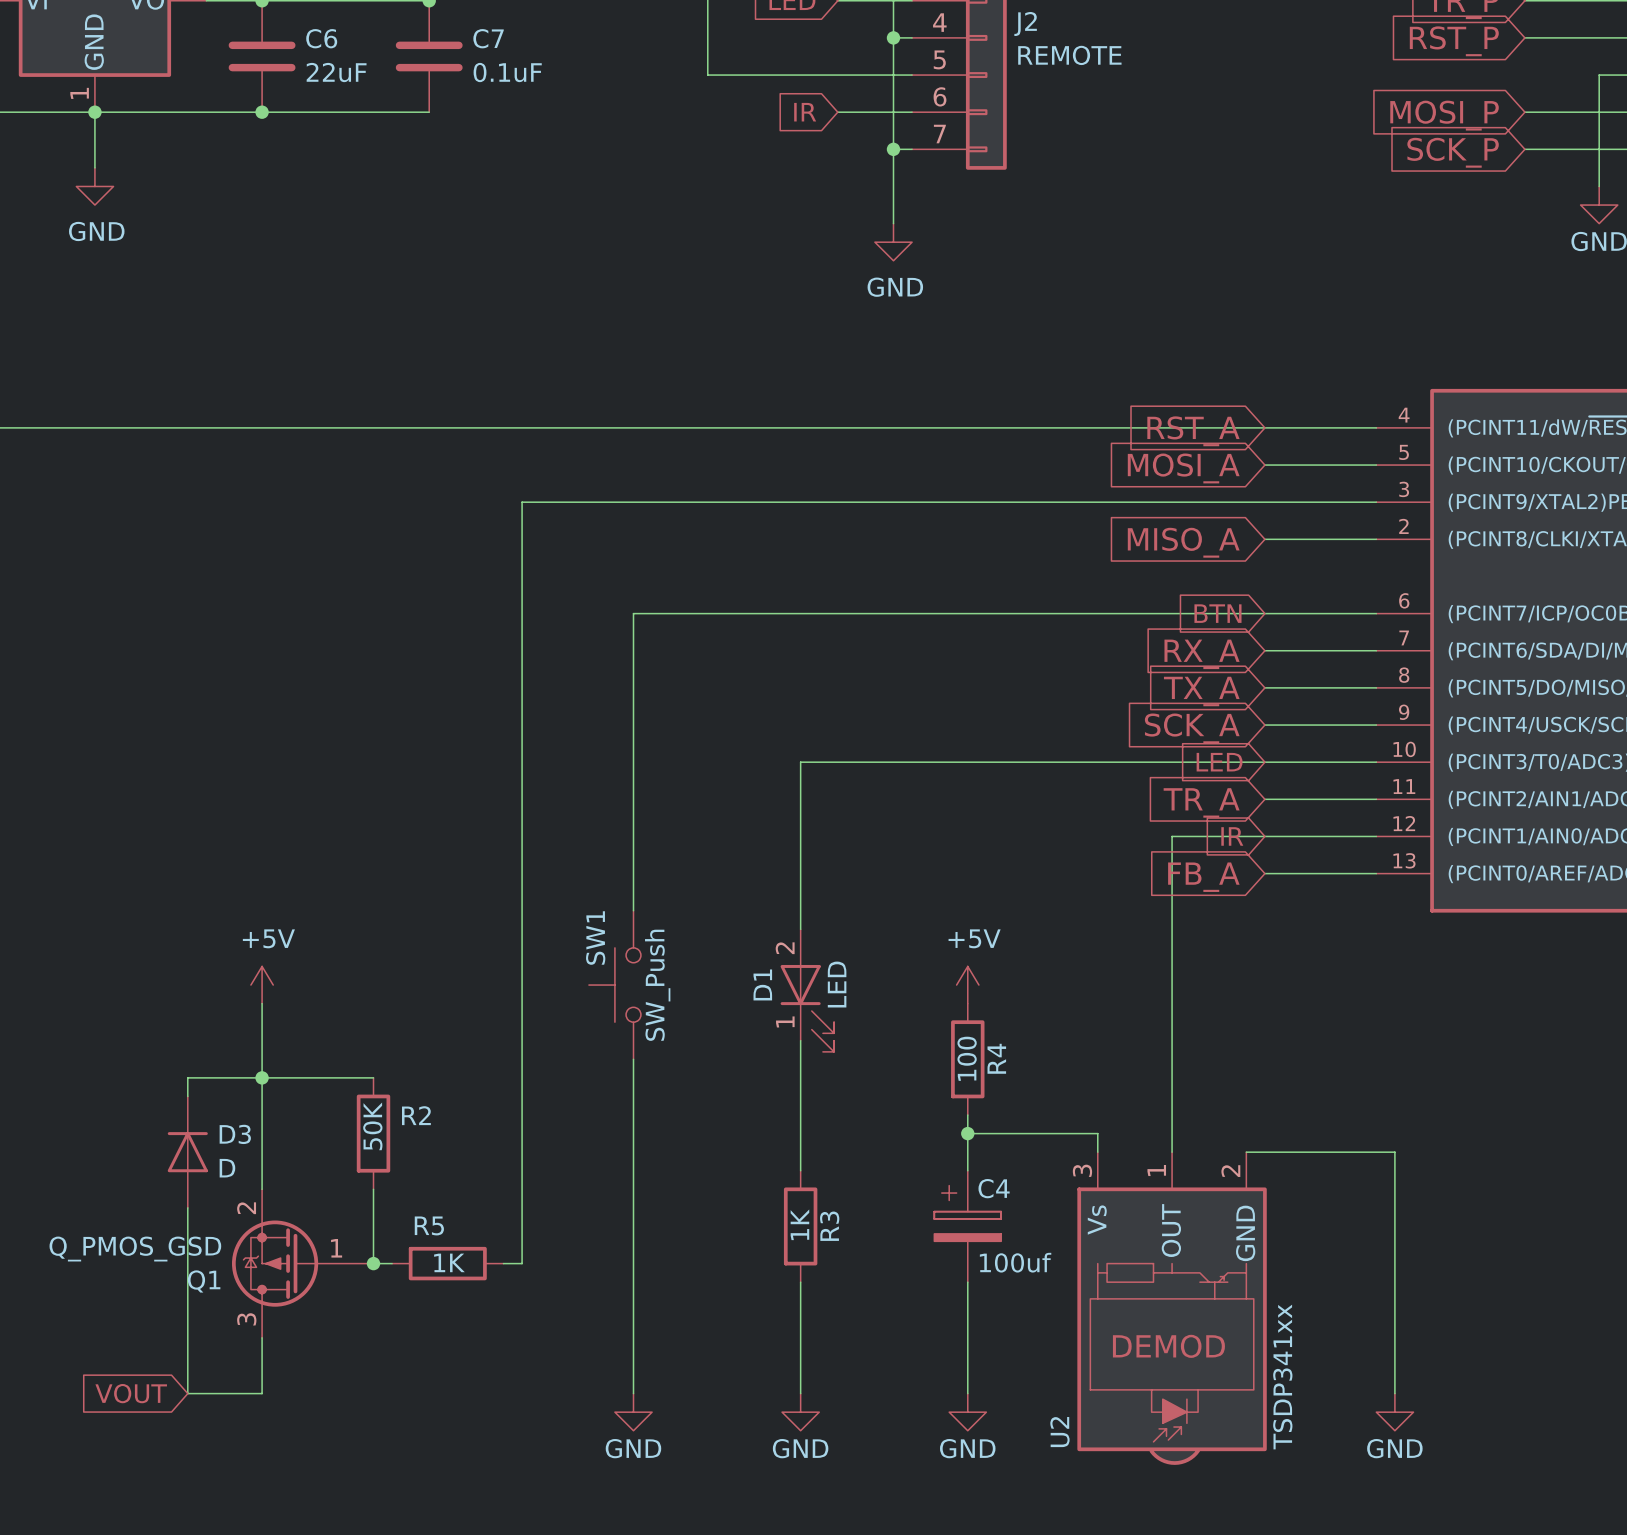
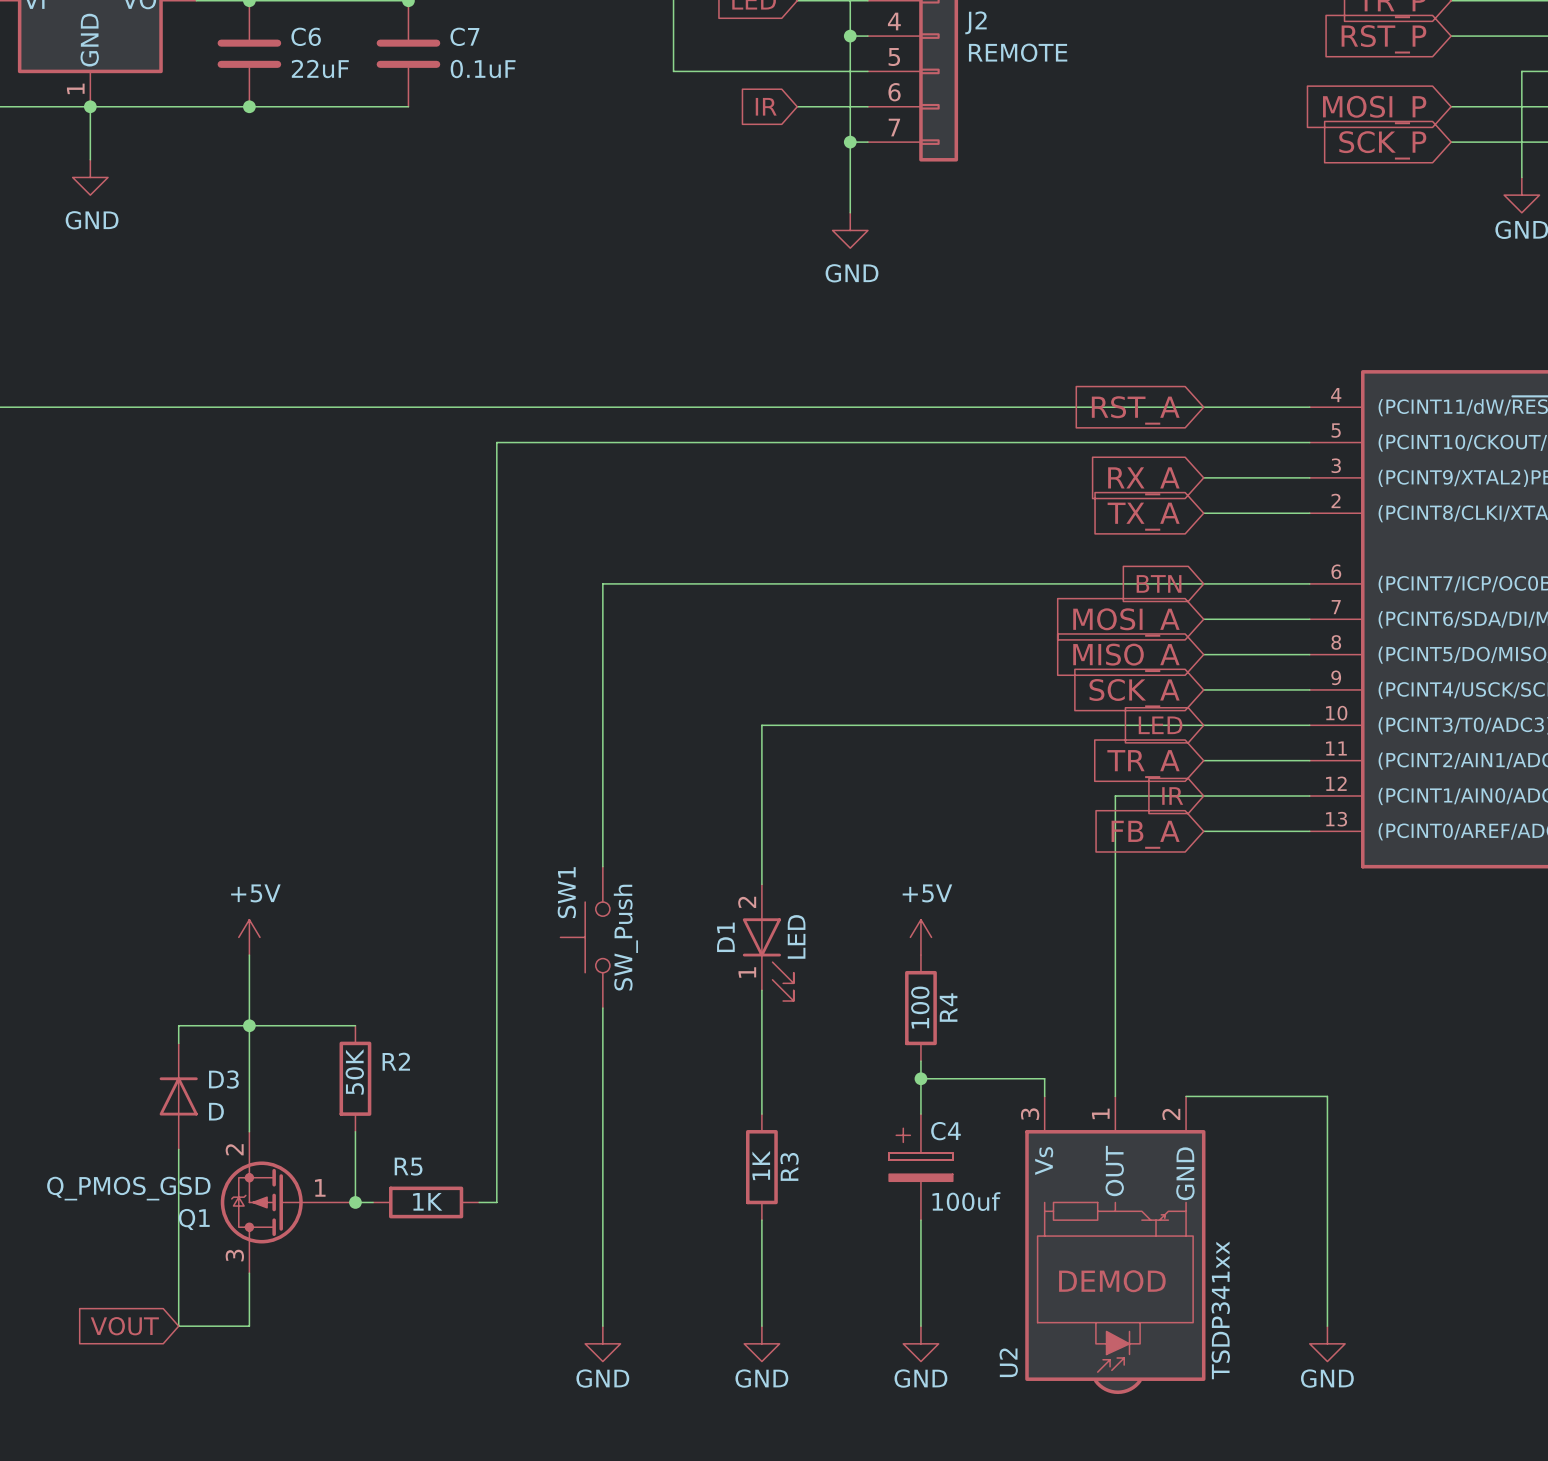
global label: MOSI_A (1183, 468) -> none
wire: (522, 502) (1264, 502) -> (496, 477) (496, 442) (1203, 442)
global label: none -> RX_A (1143, 481)
global label: MISO_A (1183, 542) -> TX_A (1143, 516)
global label: RX_A (1202, 654) -> MOSI_A (1126, 622)
global label: TX_A (1201, 691) -> MISO_A (1126, 657)

